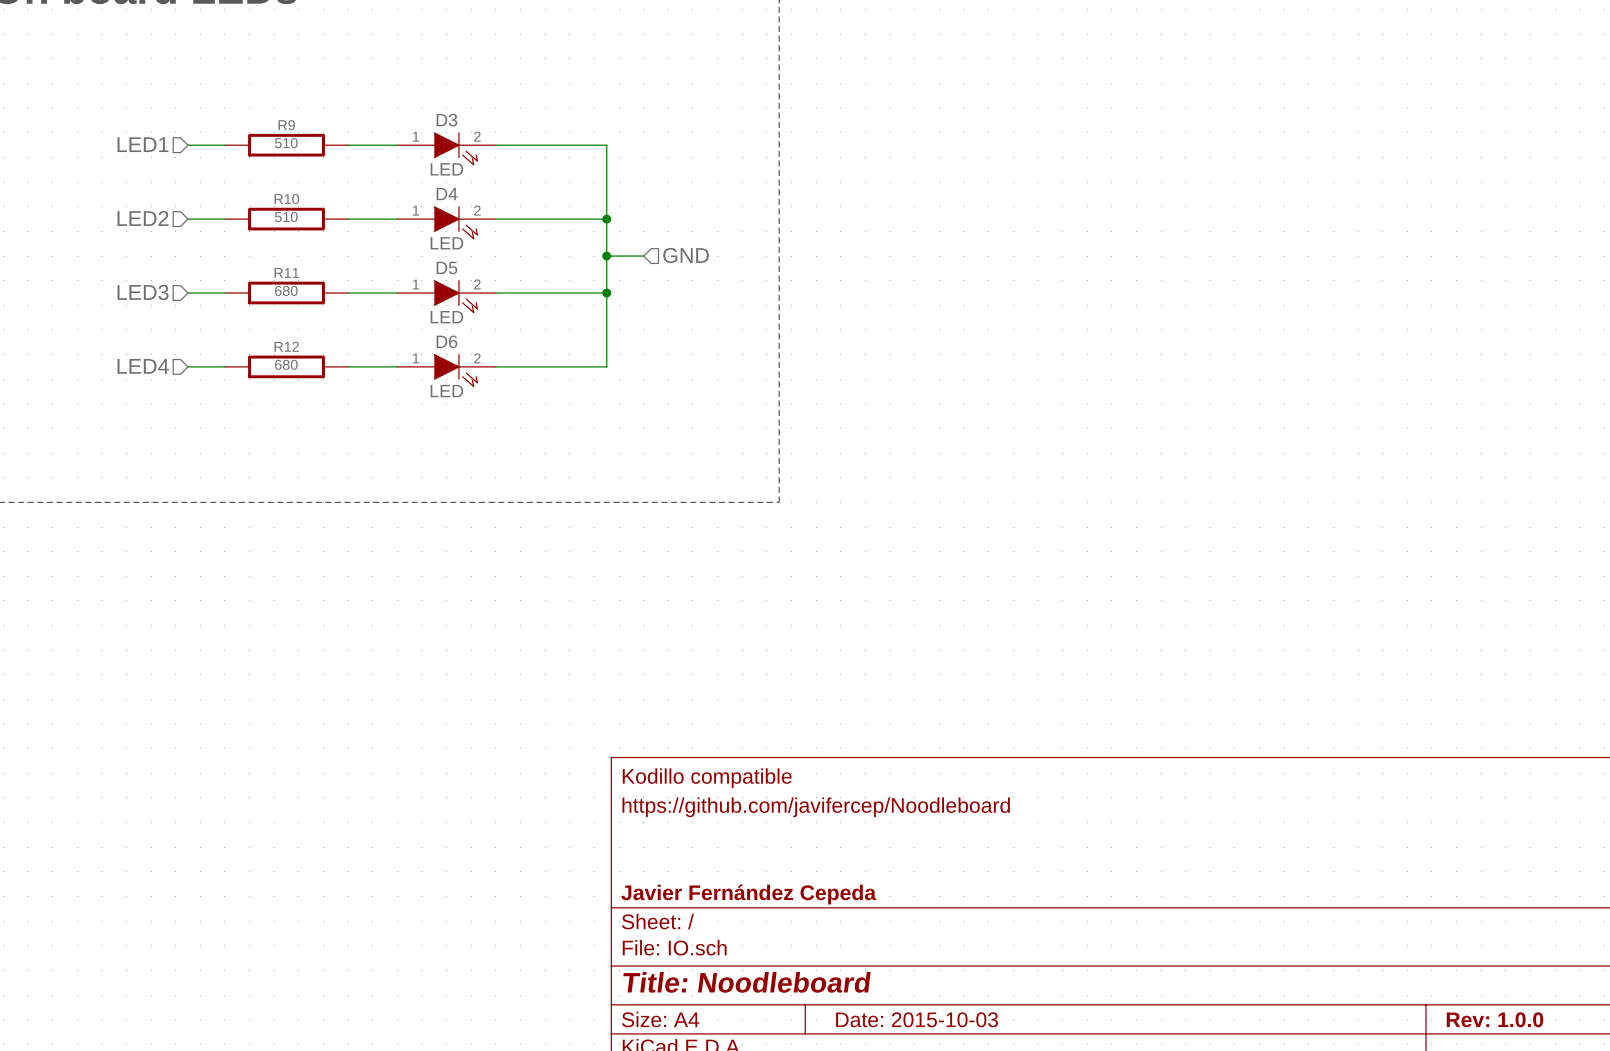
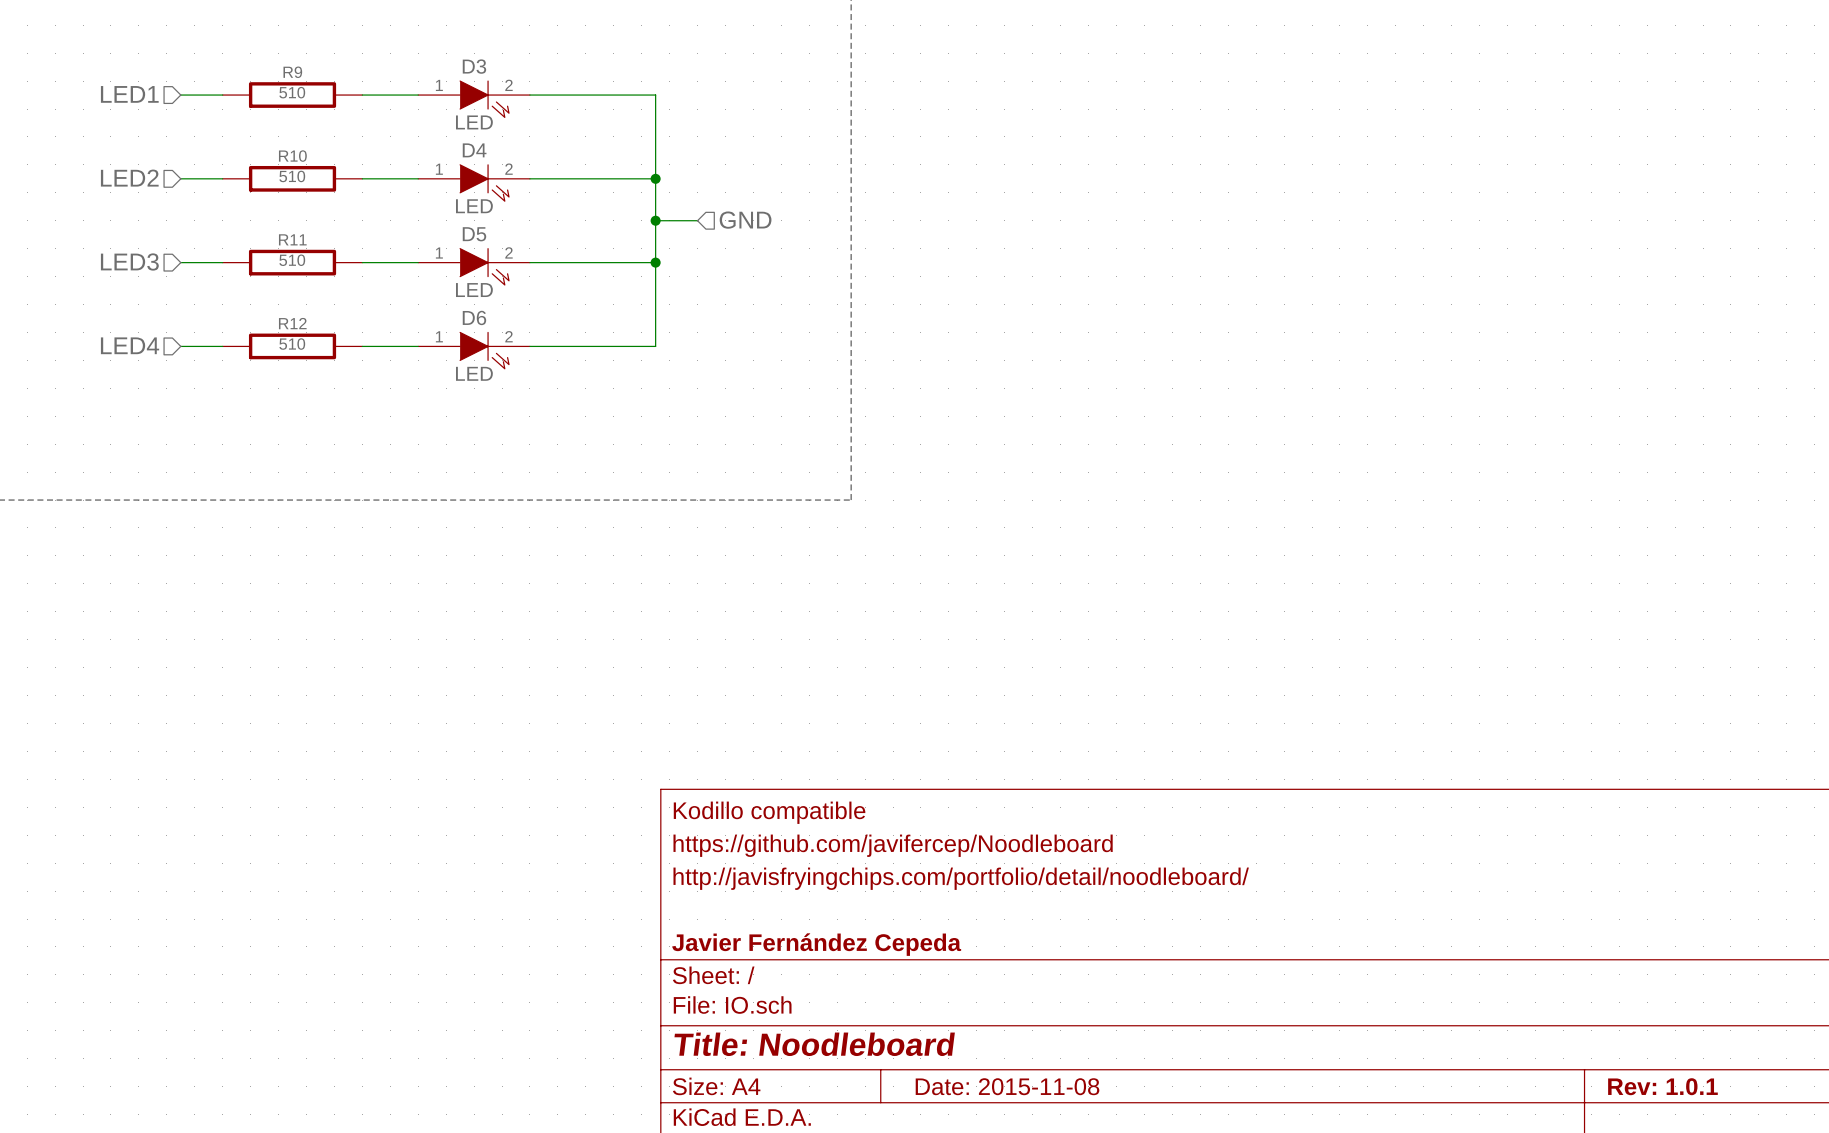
R11 value: 680 (286, 290) -> 510 (292, 260)
R12 value: 680 (286, 364) -> 510 (292, 344)
title block: none -> http://javisfryingchips.com/portfolio/detail/noodleboard/ (961, 878)
title block: Date: 2015-10-03 (917, 1019) -> Date: 2015-11-08 (1007, 1086)
title block: Rev: 1.0.0 (1495, 1019) -> Rev: 1.0.1 (1662, 1086)

